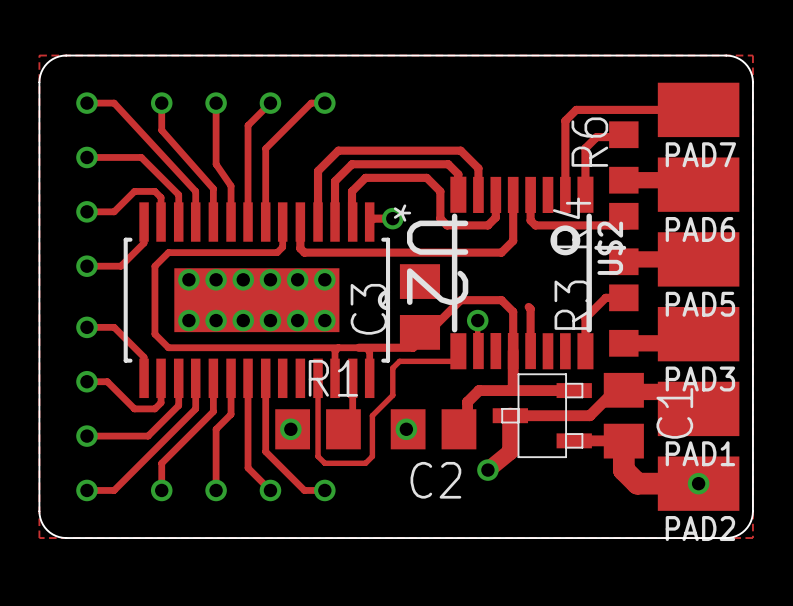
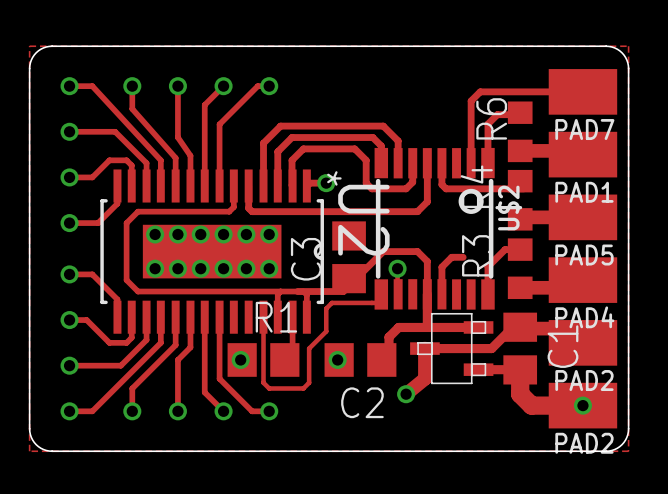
PAD6 name: PAD6 (700, 229) -> PAD1 (584, 192)
track: (528, 306) (530, 308) (530, 318) -> (463, 257) (451, 257) (441, 267)
PAD3 name: PAD3 (700, 379) -> PAD4 (584, 317)
PAD1 name: PAD1 (700, 453) -> PAD2 (584, 380)

